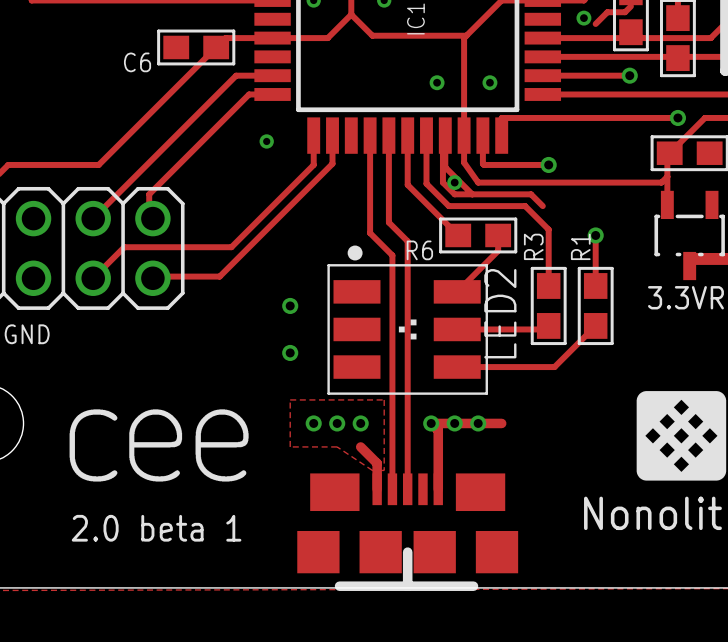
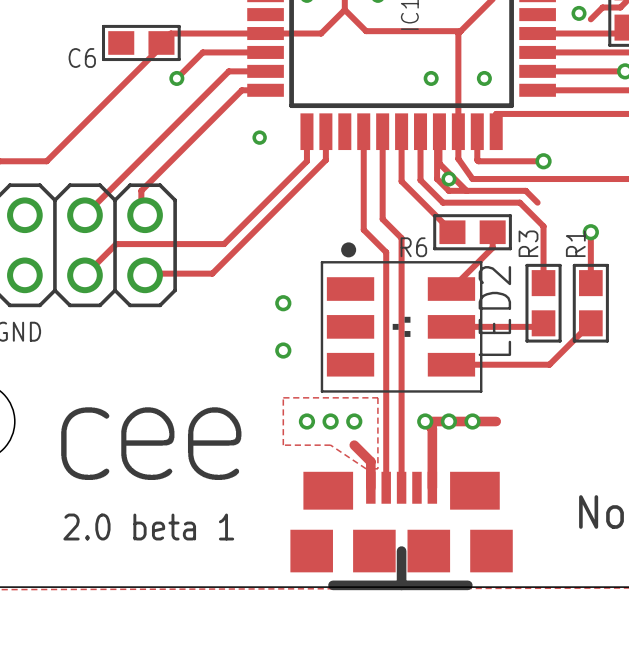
track: (225, 38) (98, 164) (55, 164) -> (218, 33) (170, 33) (161, 42) (165, 42) (46, 161)
C6 position: (196, 47) -> (141, 42)
track: none -> (265, 52) (202, 52) (176, 78)
via: none -> (176, 78)

